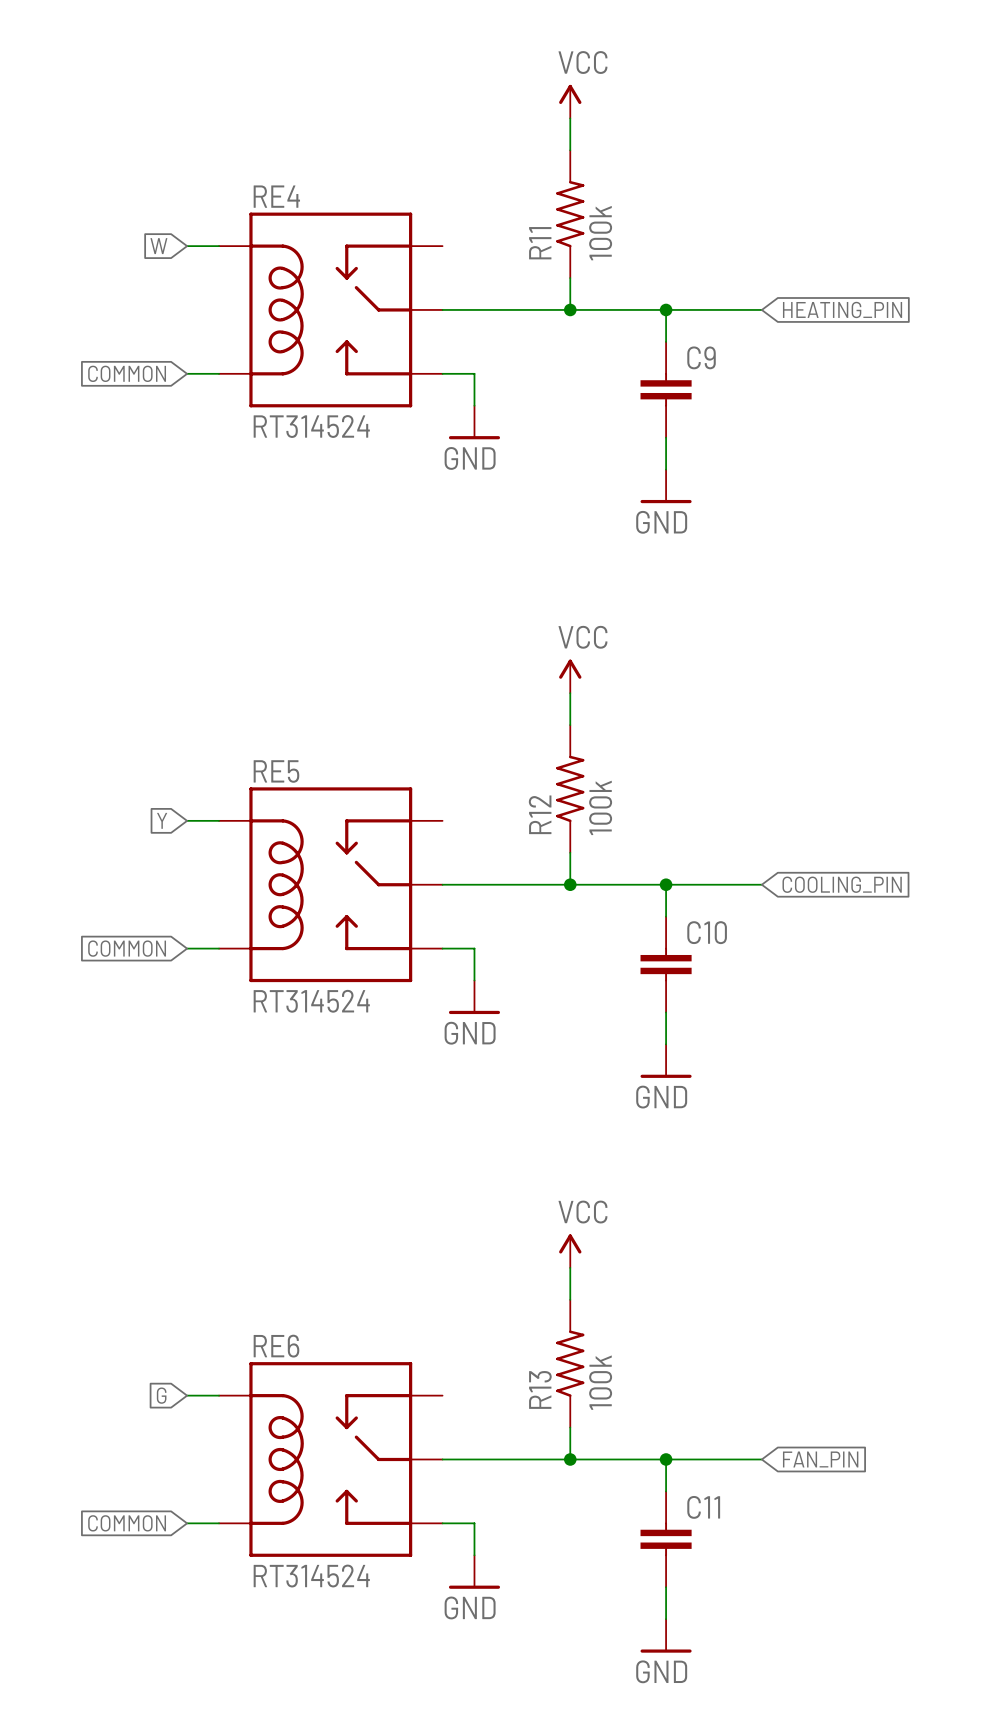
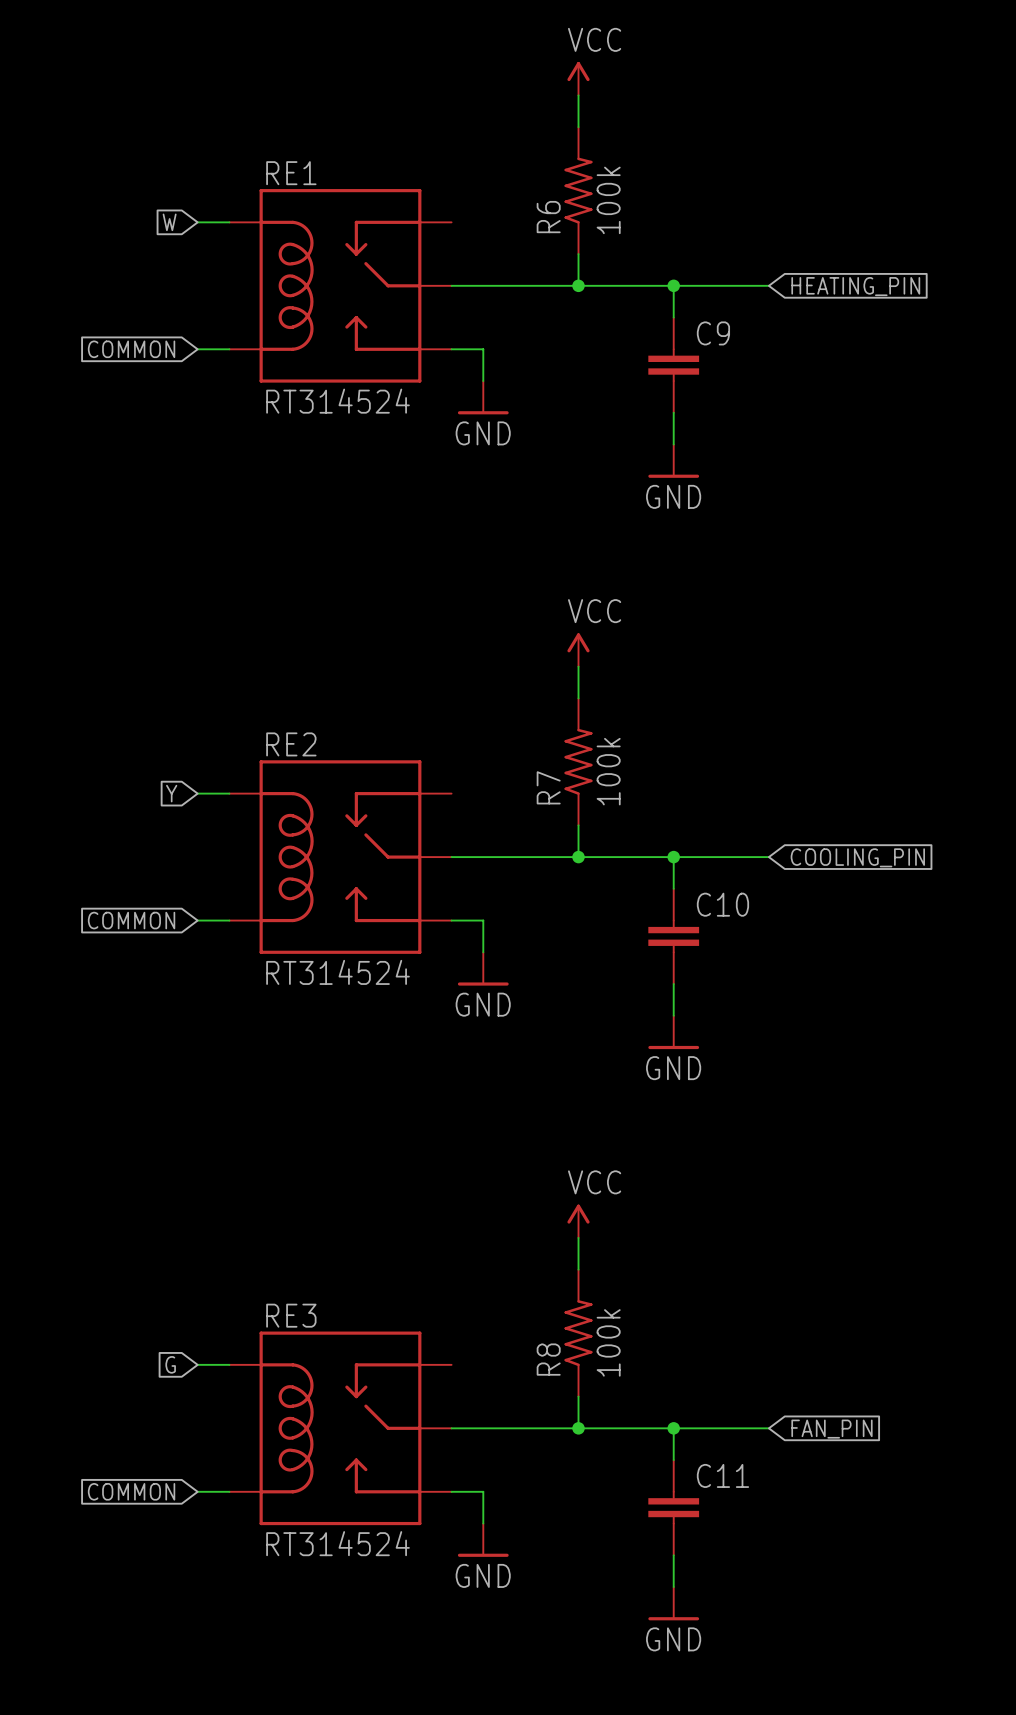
RE4 name: RE4 (276, 196) -> RE1 (291, 173)
R11 name: R11 (540, 243) -> R6 (548, 217)
RE5 name: RE5 (276, 771) -> RE2 (291, 744)
R12 name: R12 (540, 814) -> R7 (548, 787)
RE6 name: RE6 (276, 1346) -> RE3 (291, 1315)
R13 name: R13 (540, 1389) -> R8 (548, 1359)

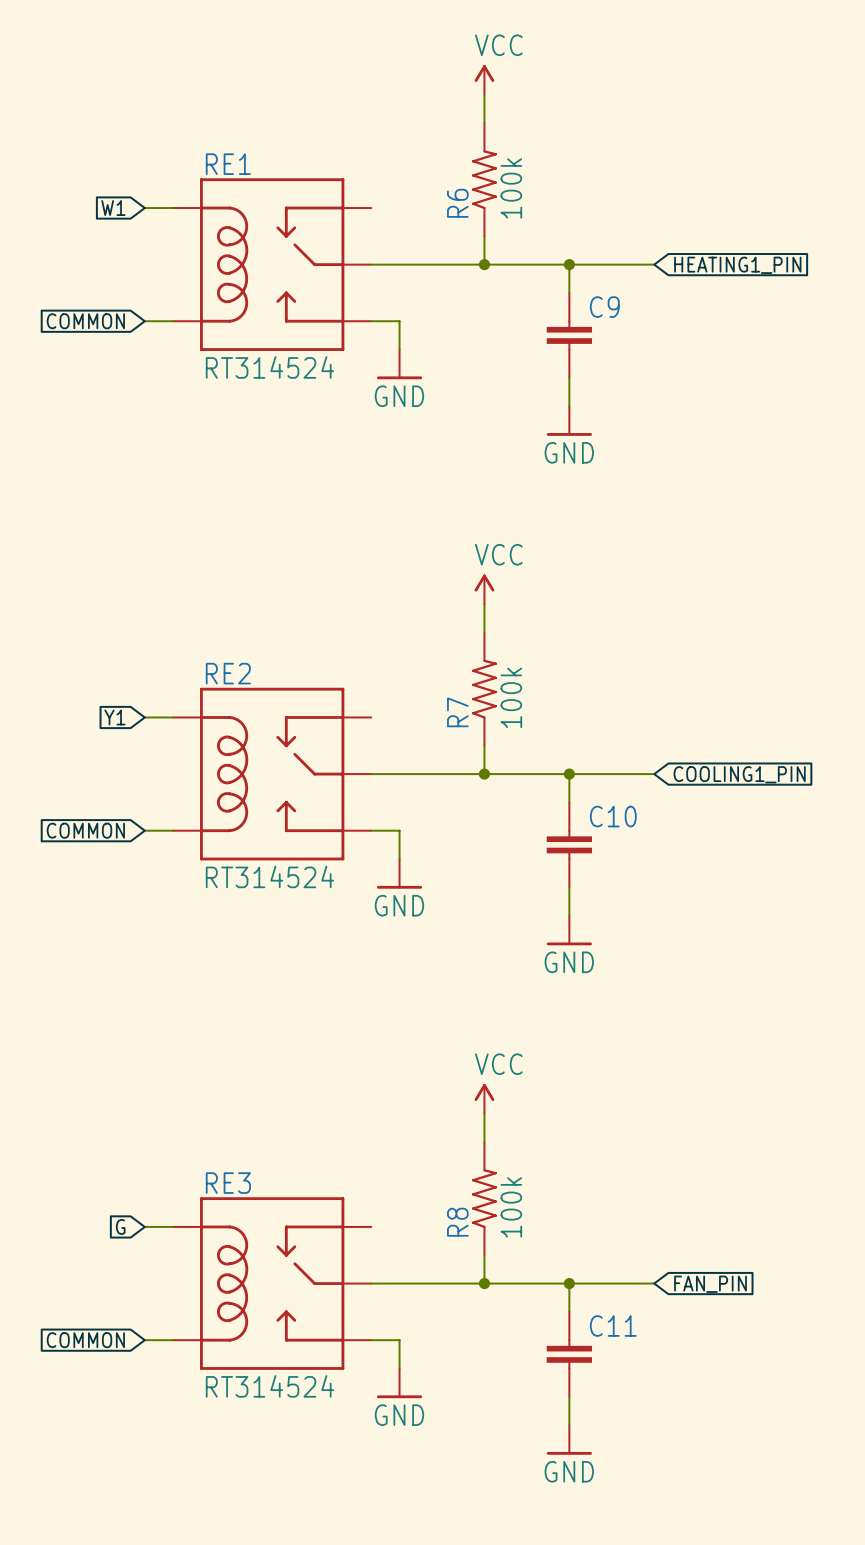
global label: W (169, 222) -> W1 (113, 208)
global label: HEATING_PIN (855, 286) -> HEATING1_PIN (737, 265)
global label: Y (171, 793) -> Y1 (114, 717)
global label: COOLING_PIN (857, 857) -> COOLING1_PIN (739, 774)

